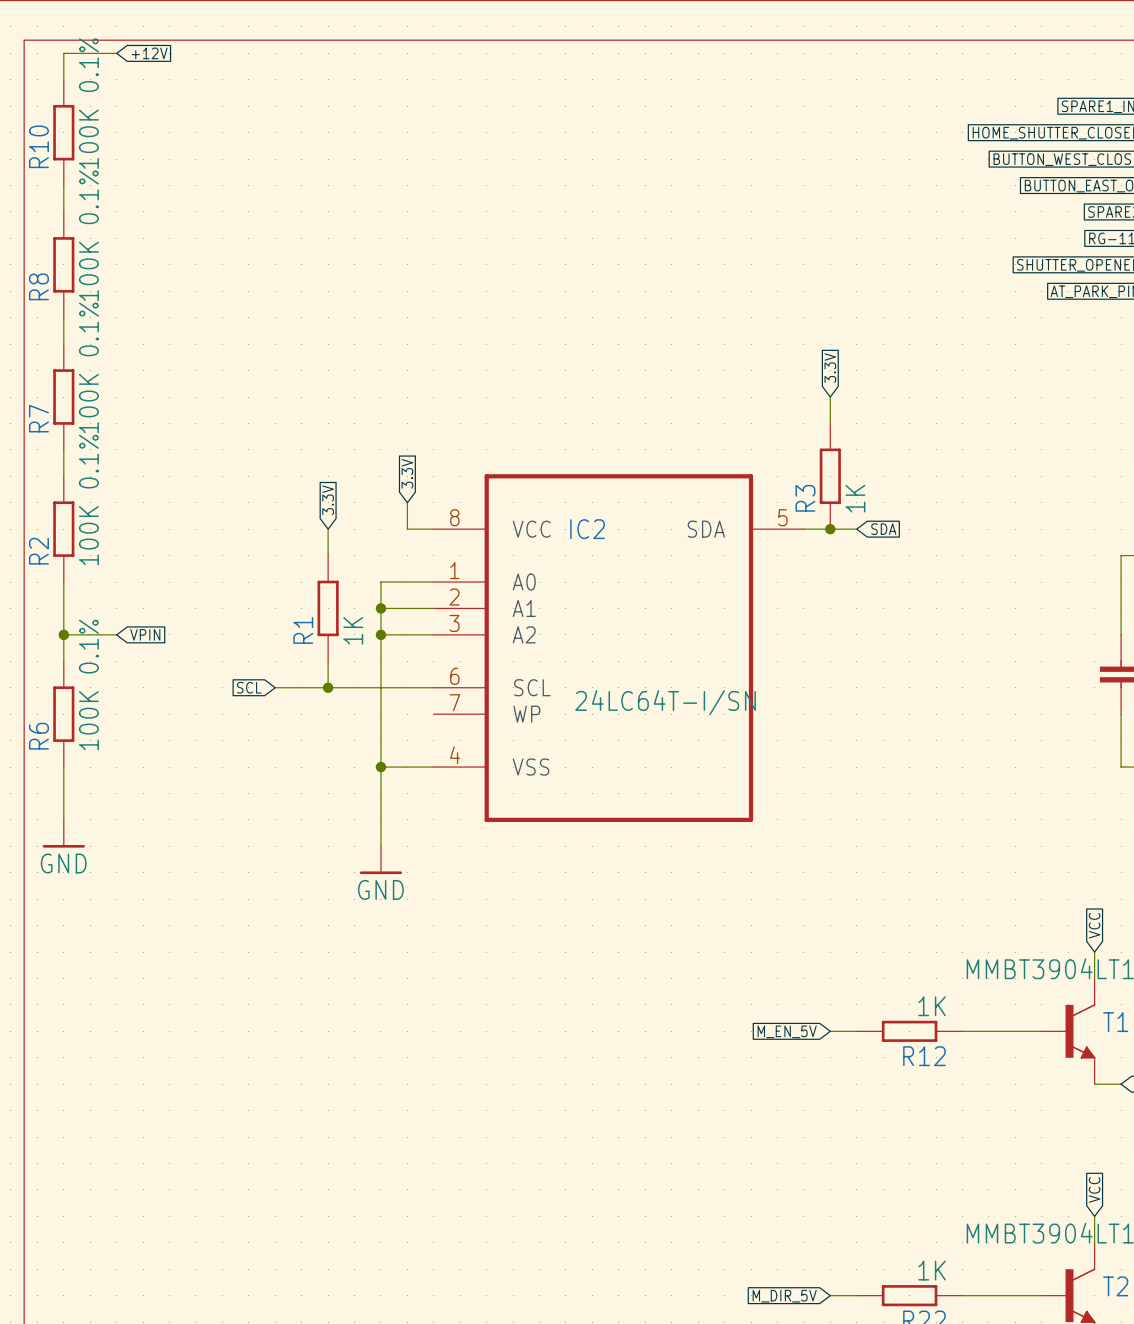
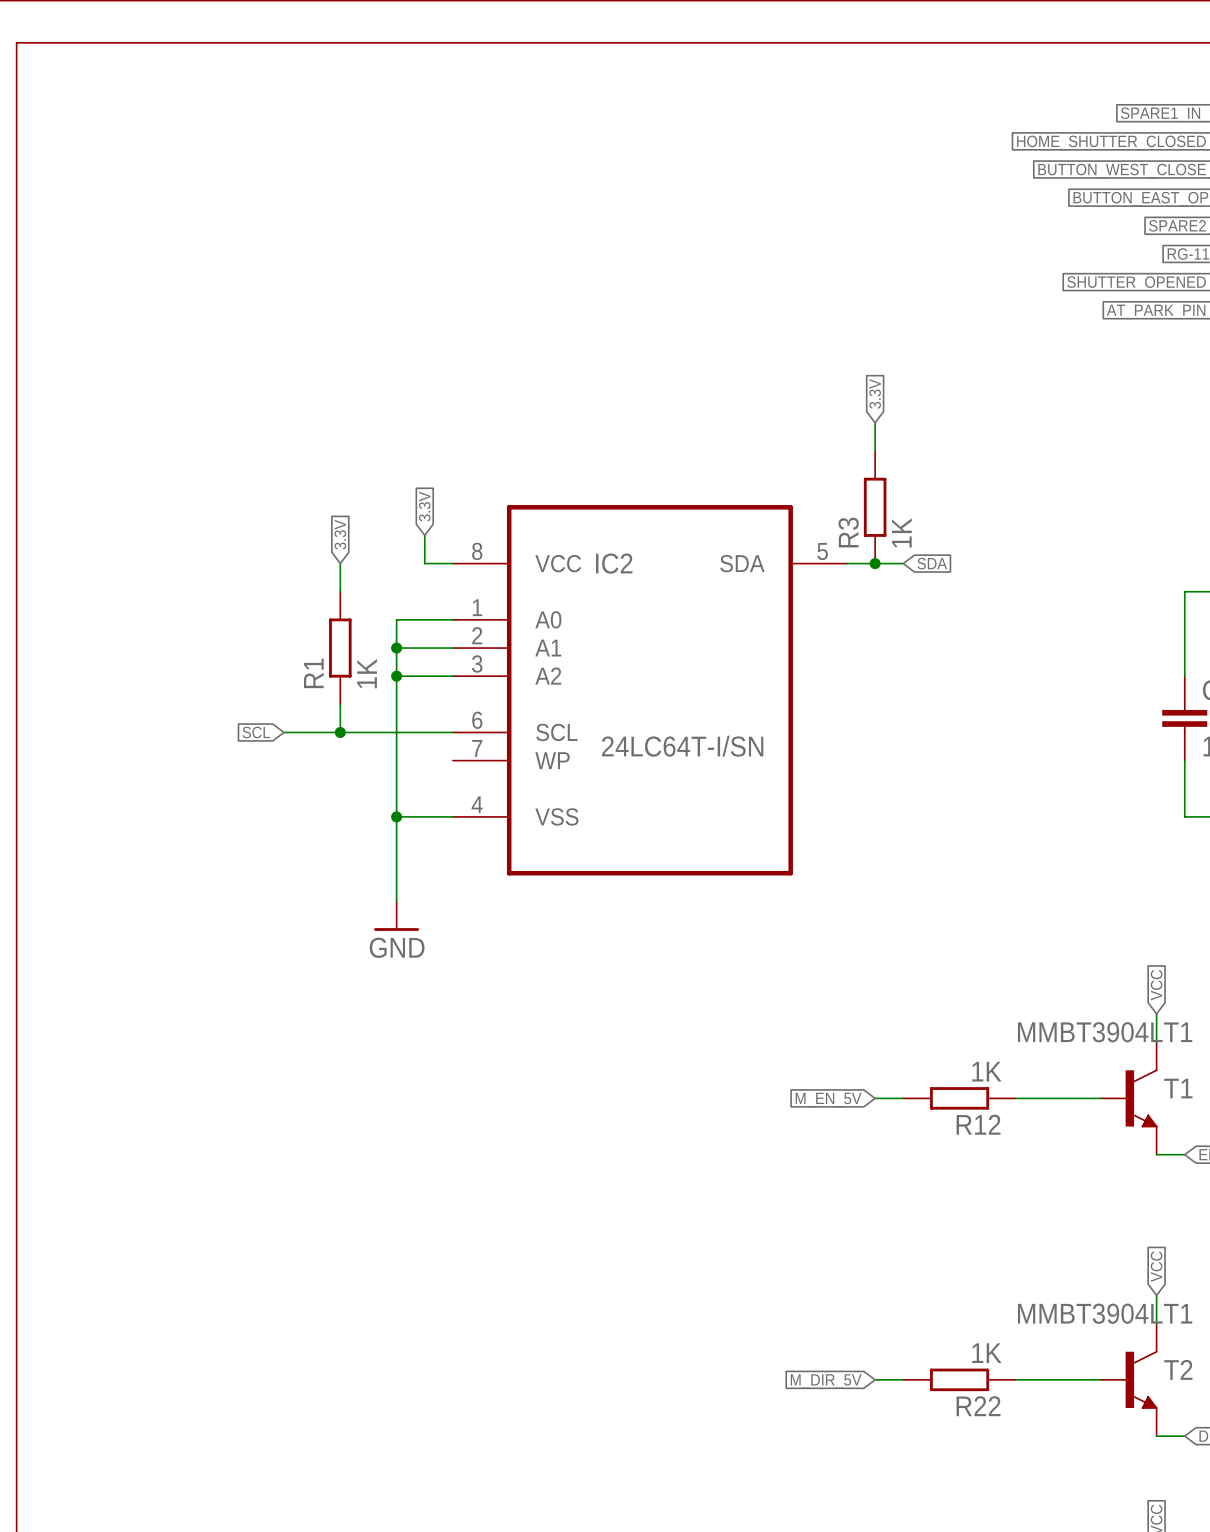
wire: (116, 53) (63, 53) (63, 79) -> none
global label: +12V (149, 53) -> none
R10: 100K 0.1% (63, 132) -> none
wire: (63, 185) (63, 211) -> none
R8: 100K 0.1% (63, 264) -> none
wire: (63, 317) (63, 344) -> none
R7: 100K 0.1% (63, 397) -> none
wire: (63, 449) (63, 476) -> none
R2: 100K 0.1% (63, 529) -> none
wire: (63, 582) (63, 661) -> none
wire: (63, 634) (116, 634) -> none
junction: (63, 634) -> none
global label: VPIN (145, 634) -> none
R6: 100K 0.1% (63, 714) -> none
wire: (63, 767) (63, 819) -> none
power symbol: GND (63, 833) -> none

